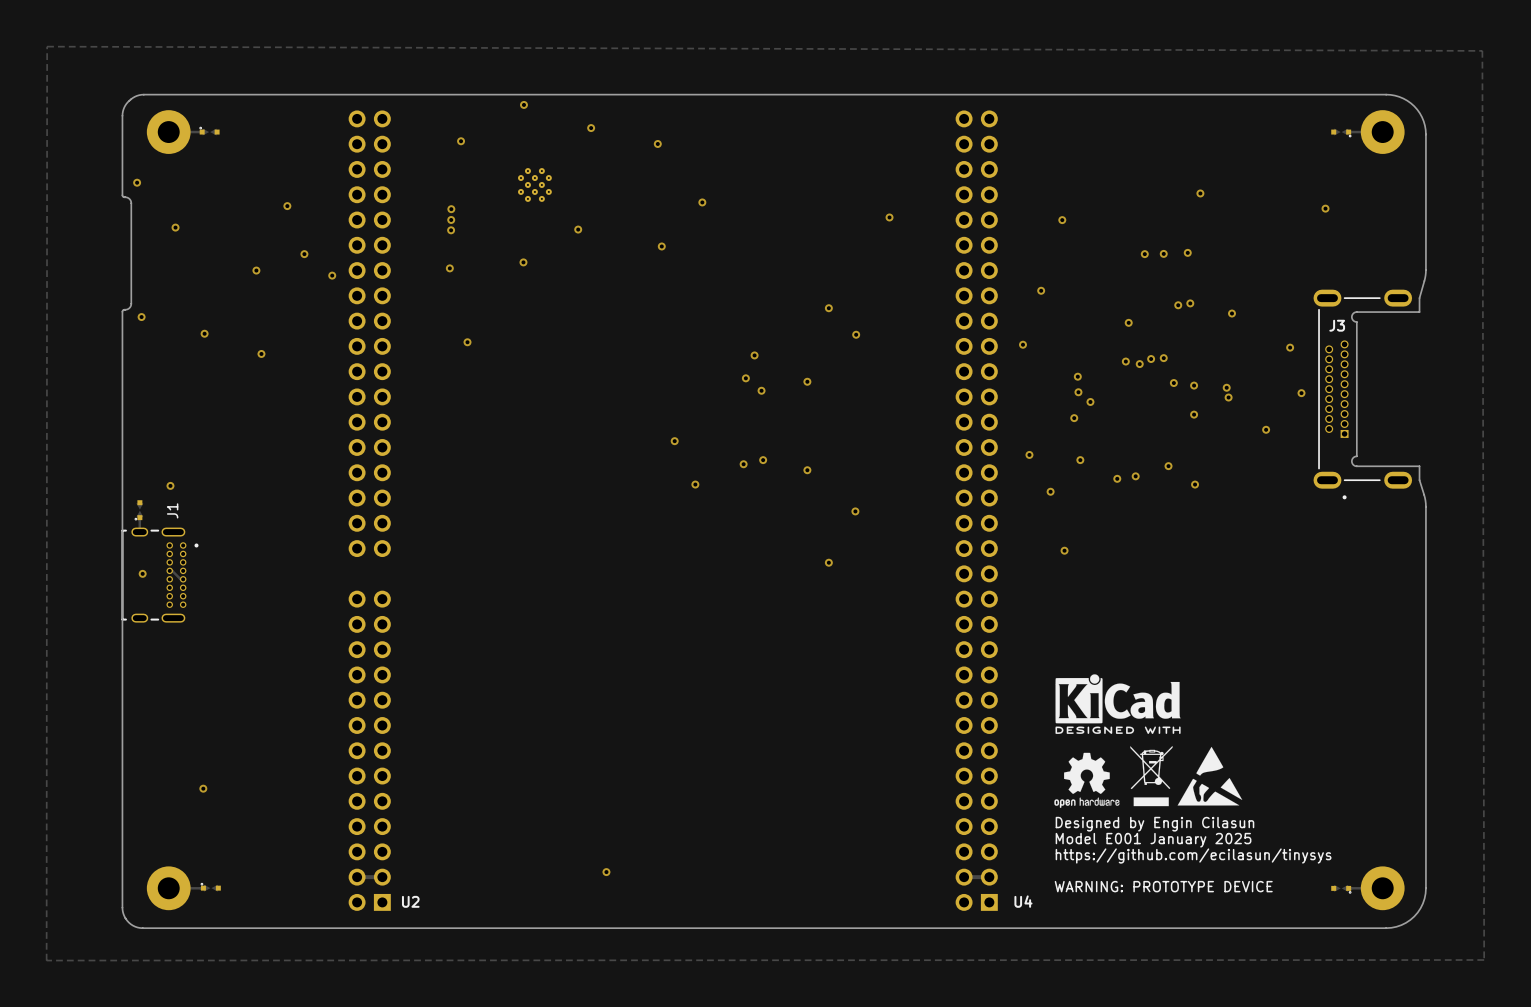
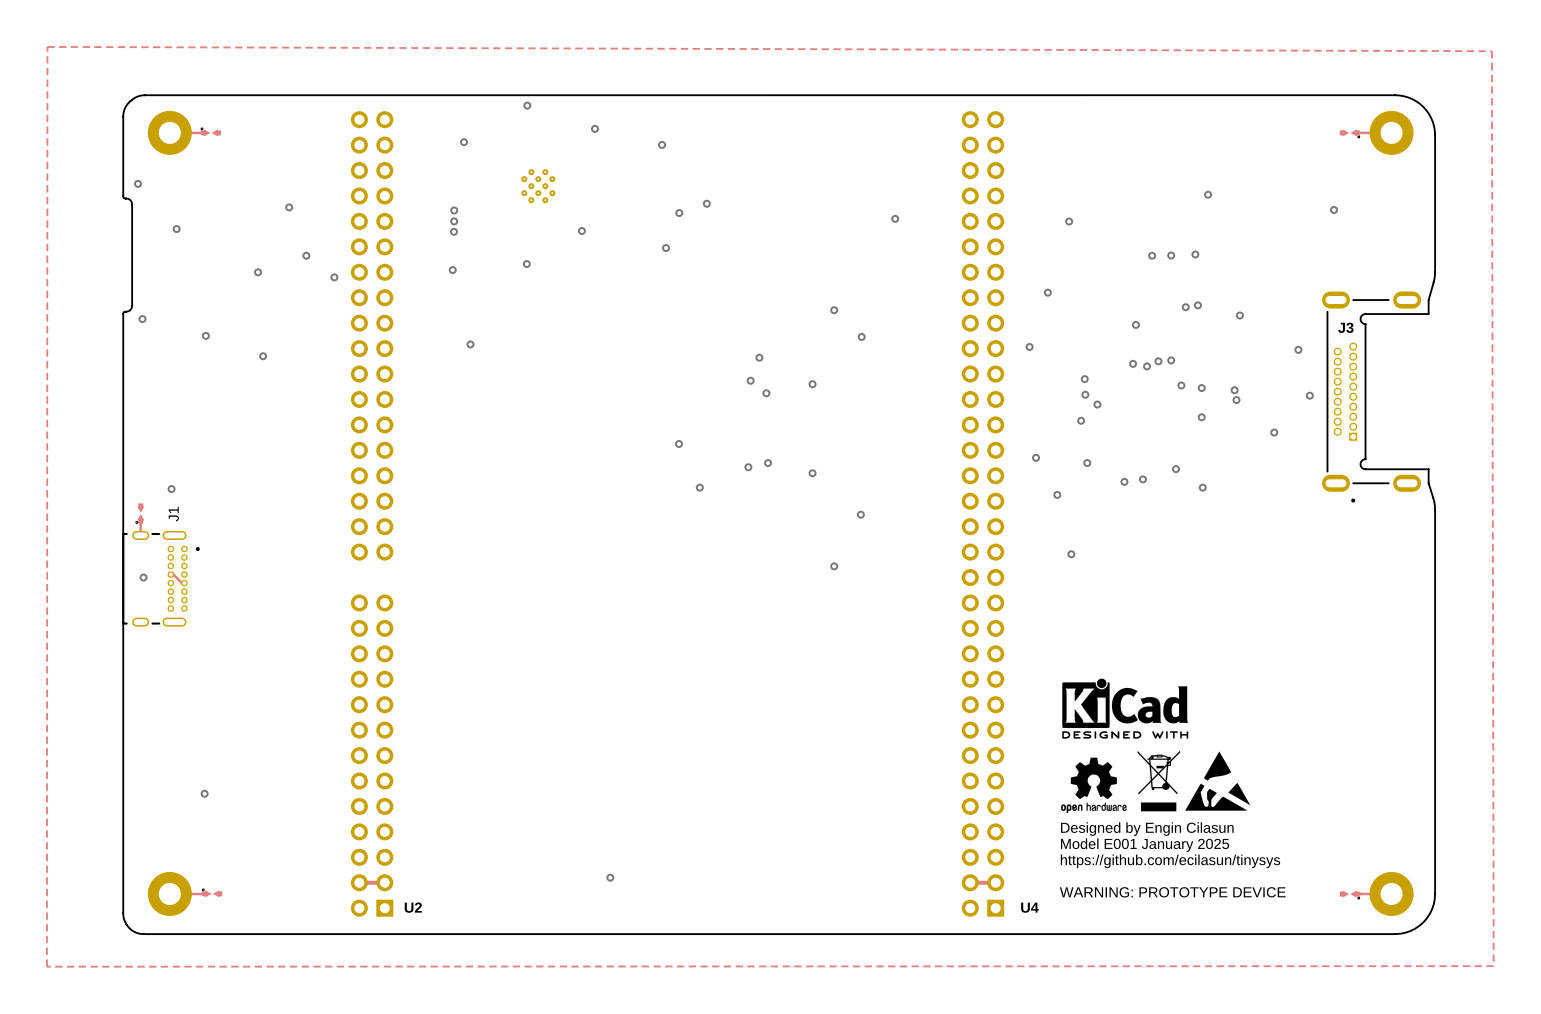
via: none -> (679, 213)

